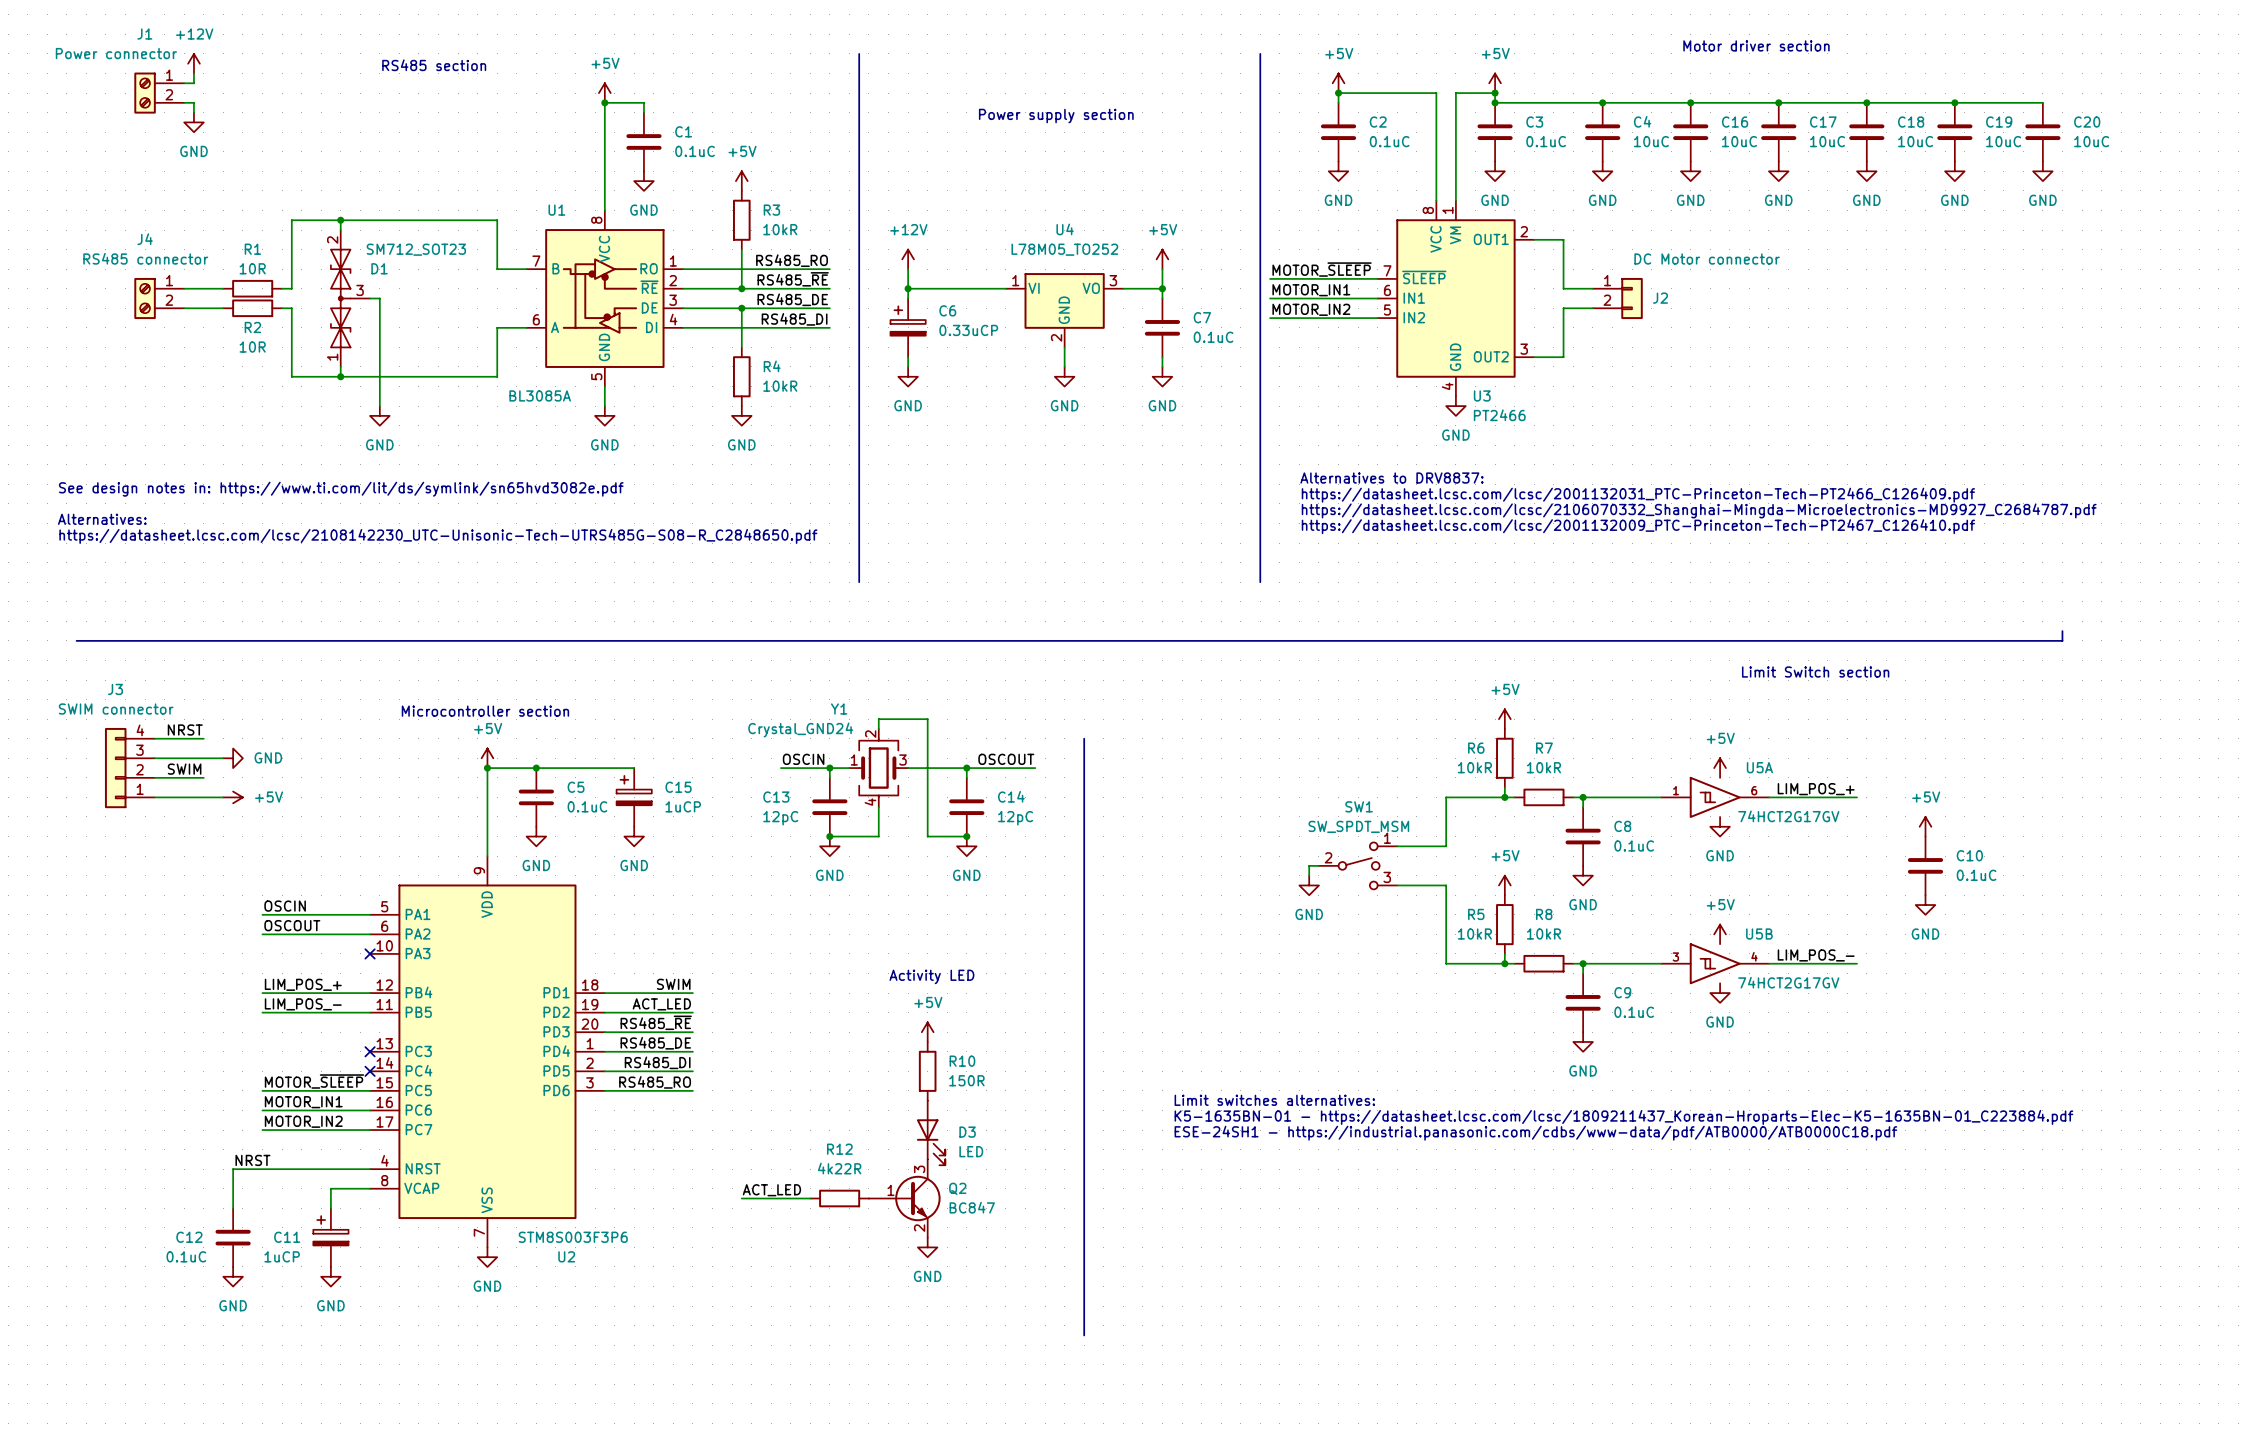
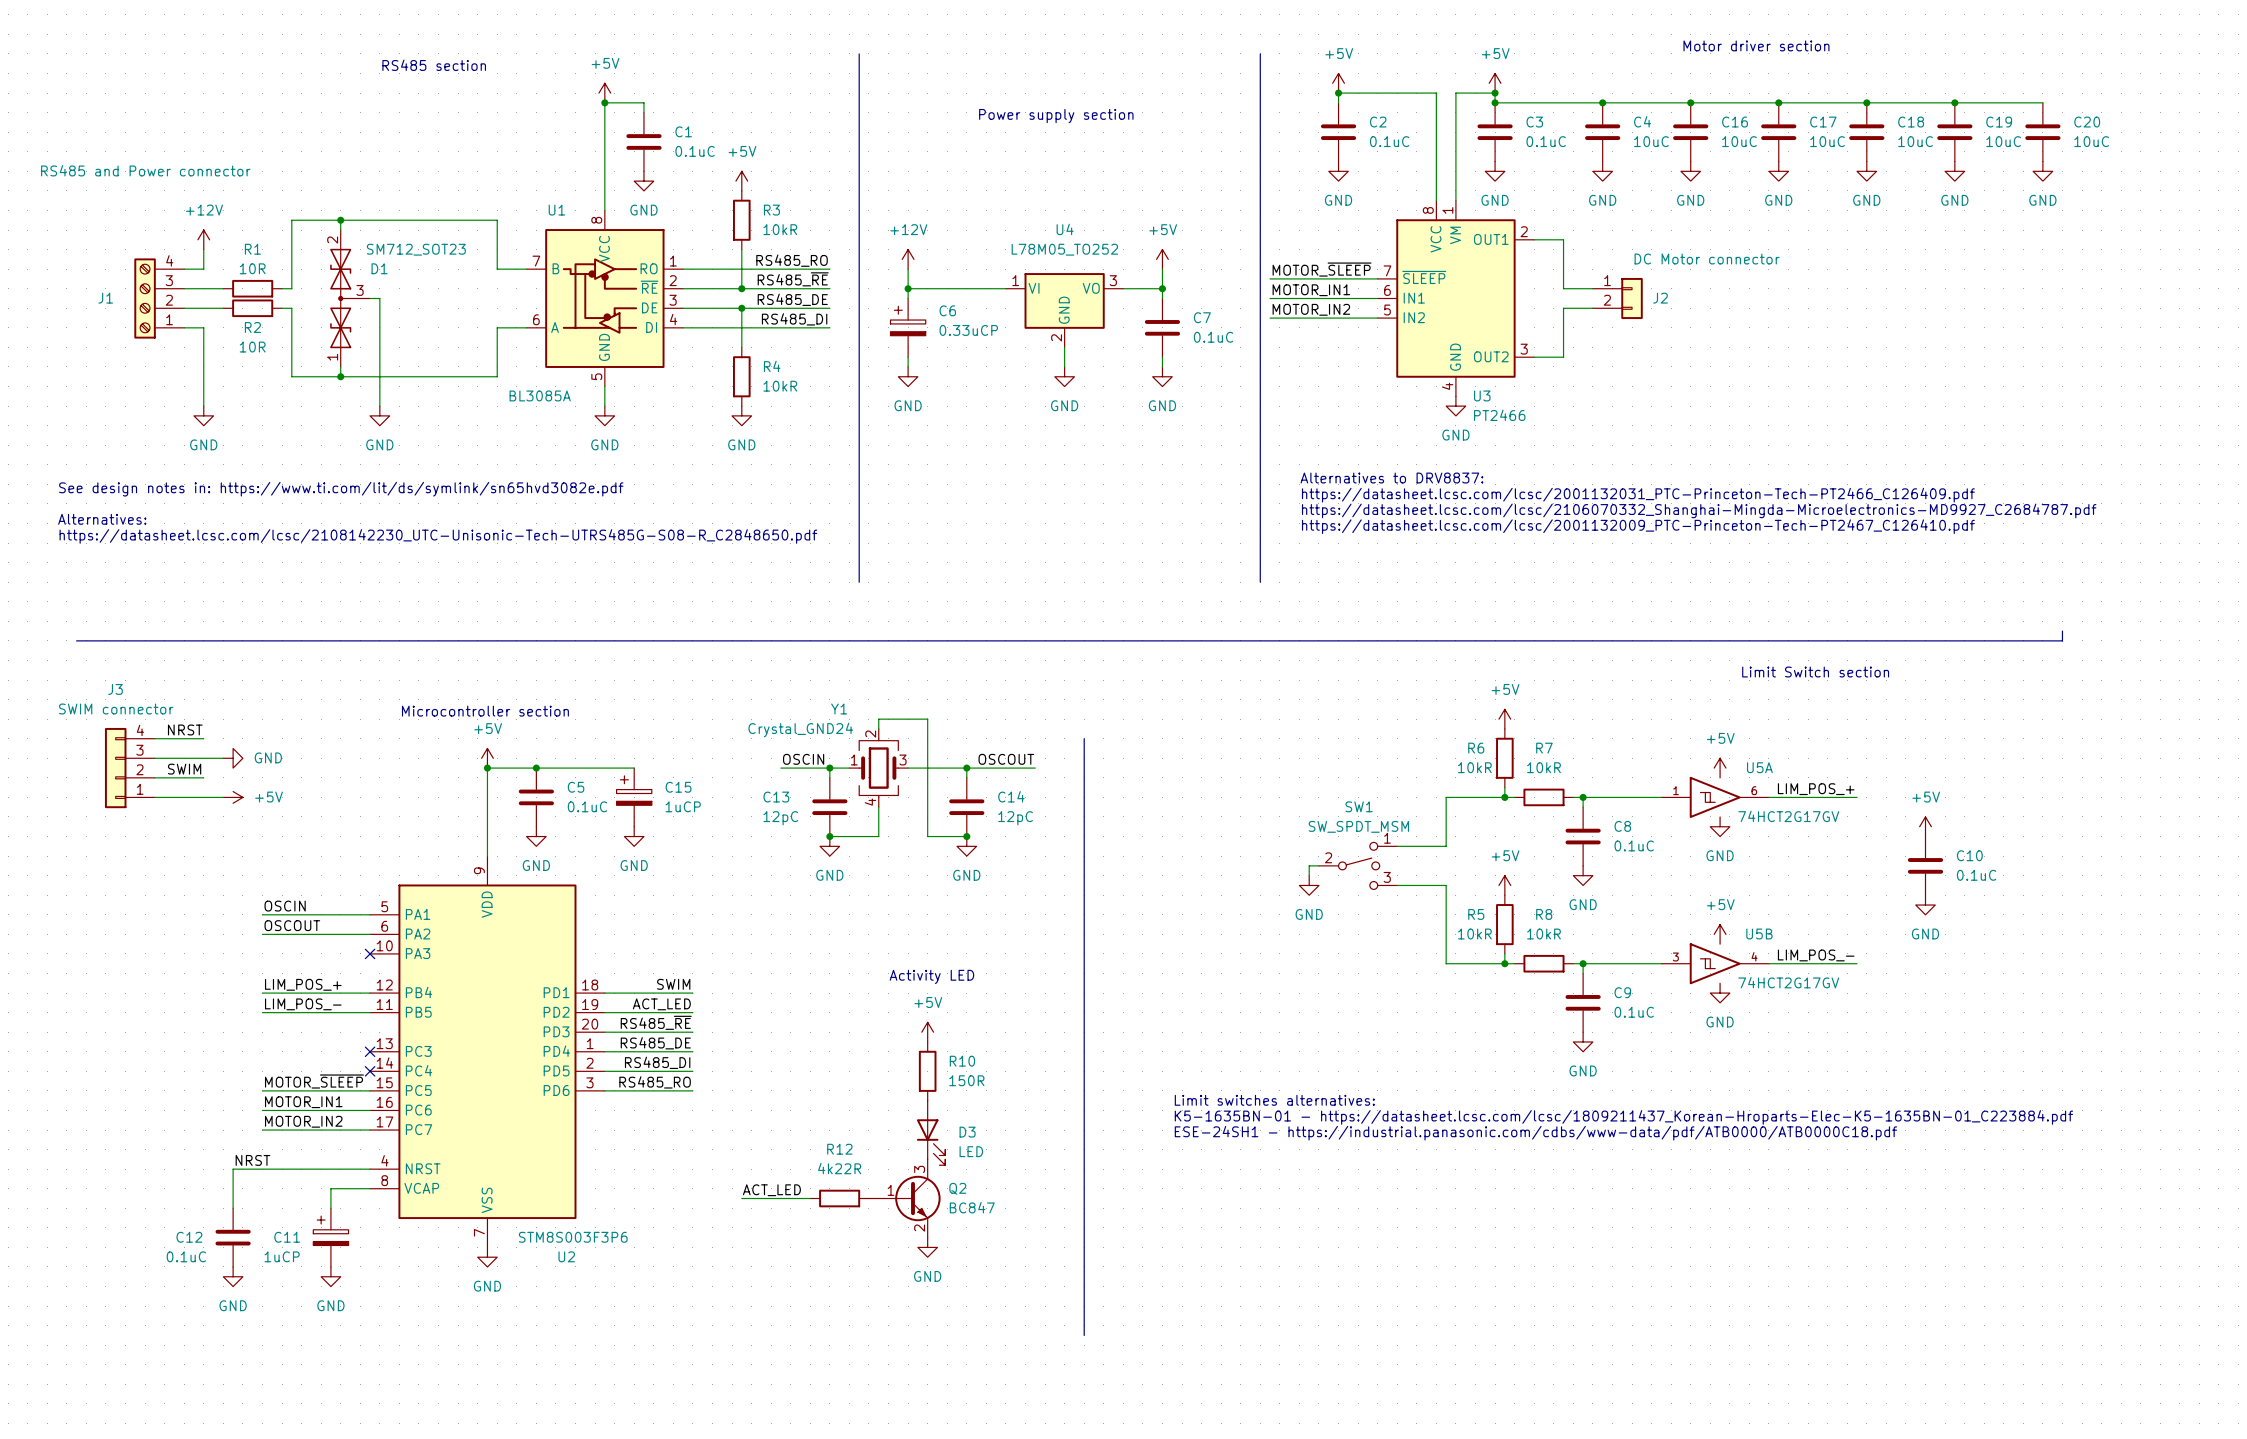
J1 name position: J1 (144, 34) -> J1 (105, 298)
J1 value: Power connector (116, 53) -> RS485 and Power connector (145, 170)
power symbol position: +12V (193, 63) -> +12V (203, 239)
J1 symbol: [134, 72, 185, 114] -> [134, 258, 185, 339]
wire: (193, 73) (193, 83) (184, 83) -> none
wire: (184, 102) (193, 102) (193, 112) -> none
power symbol: GND (193, 122) -> none
wire: none -> (203, 249) (203, 269) (184, 269)
J4: RS485 connector (159, 298) -> none
wire: none -> (184, 327) (203, 327) (203, 406)
power symbol: none -> GND (203, 415)

